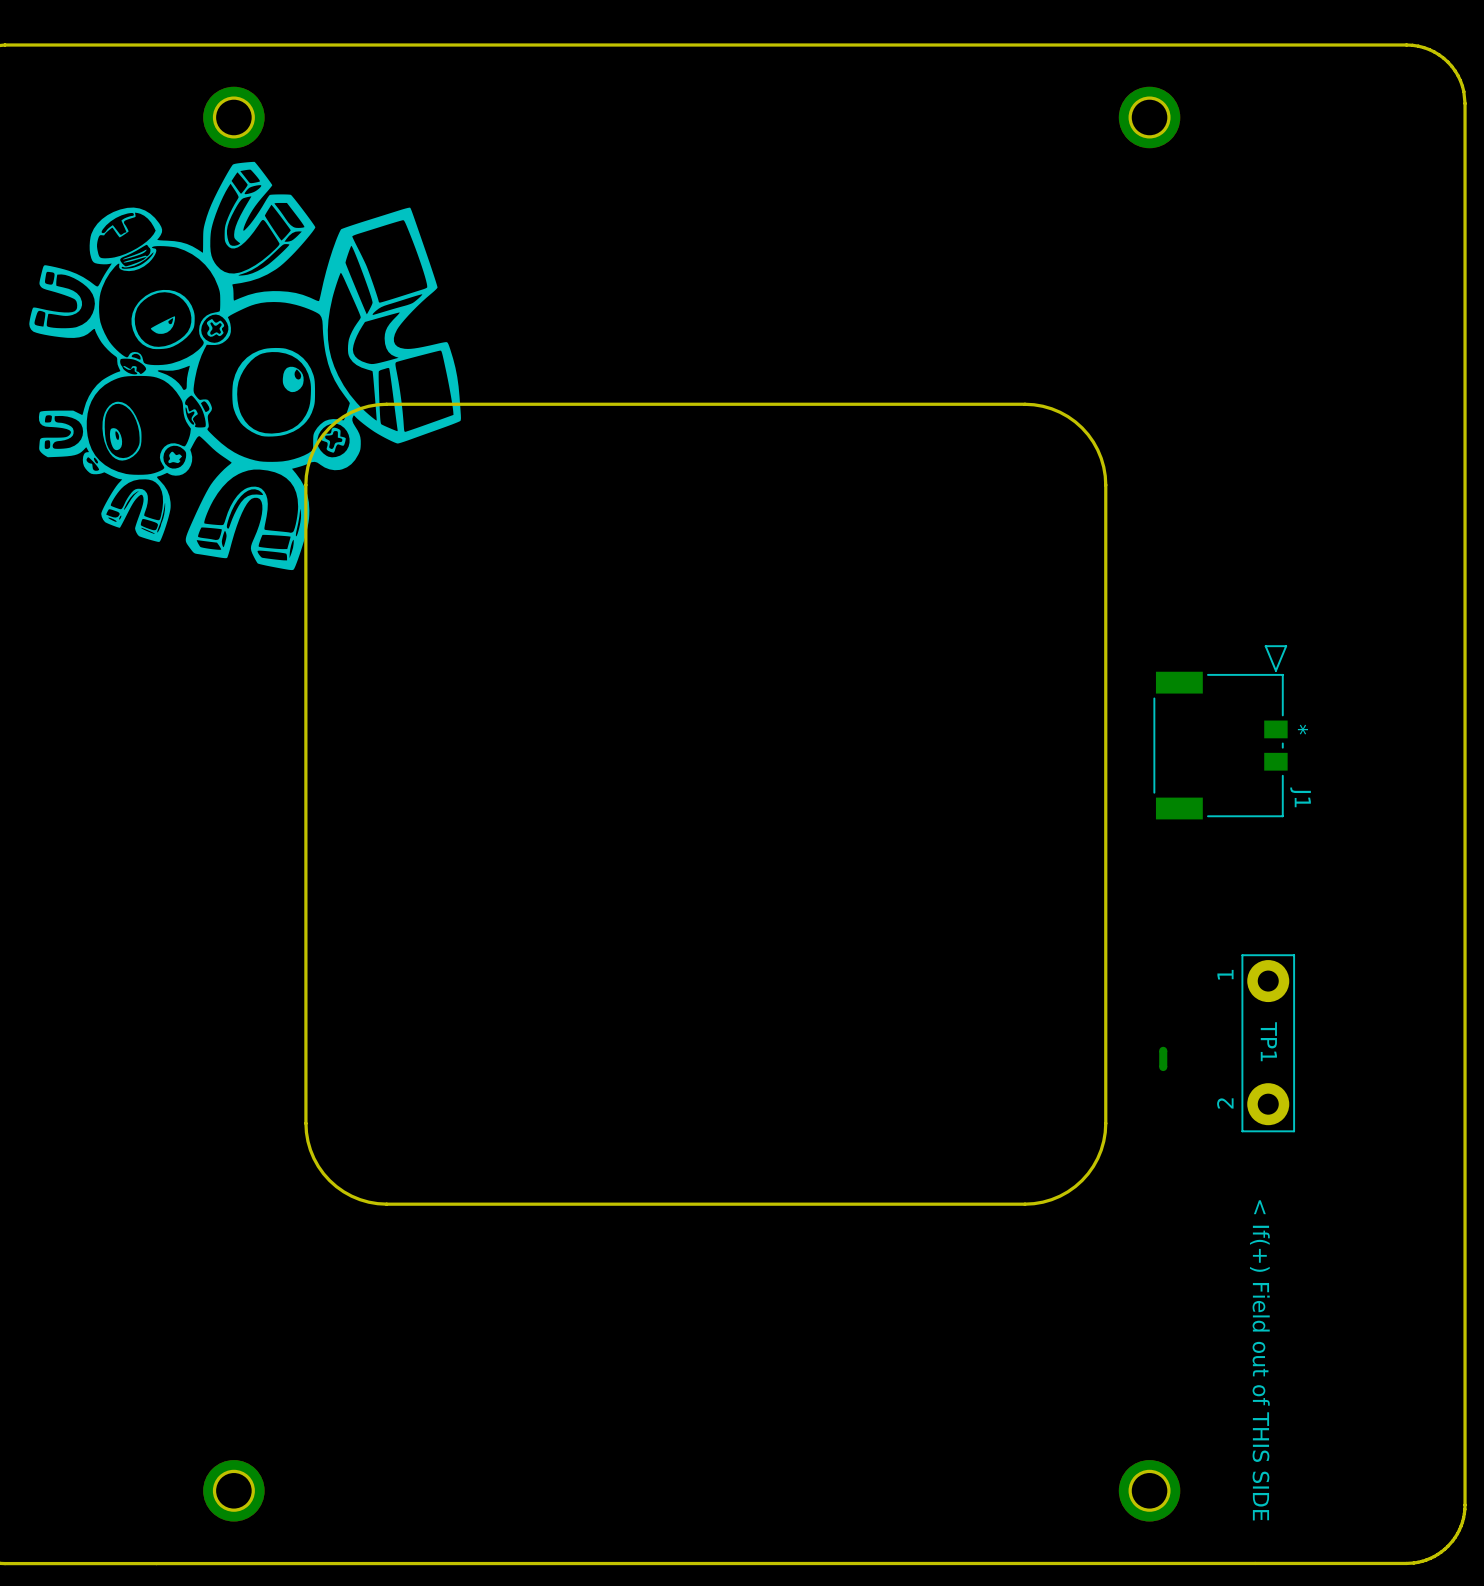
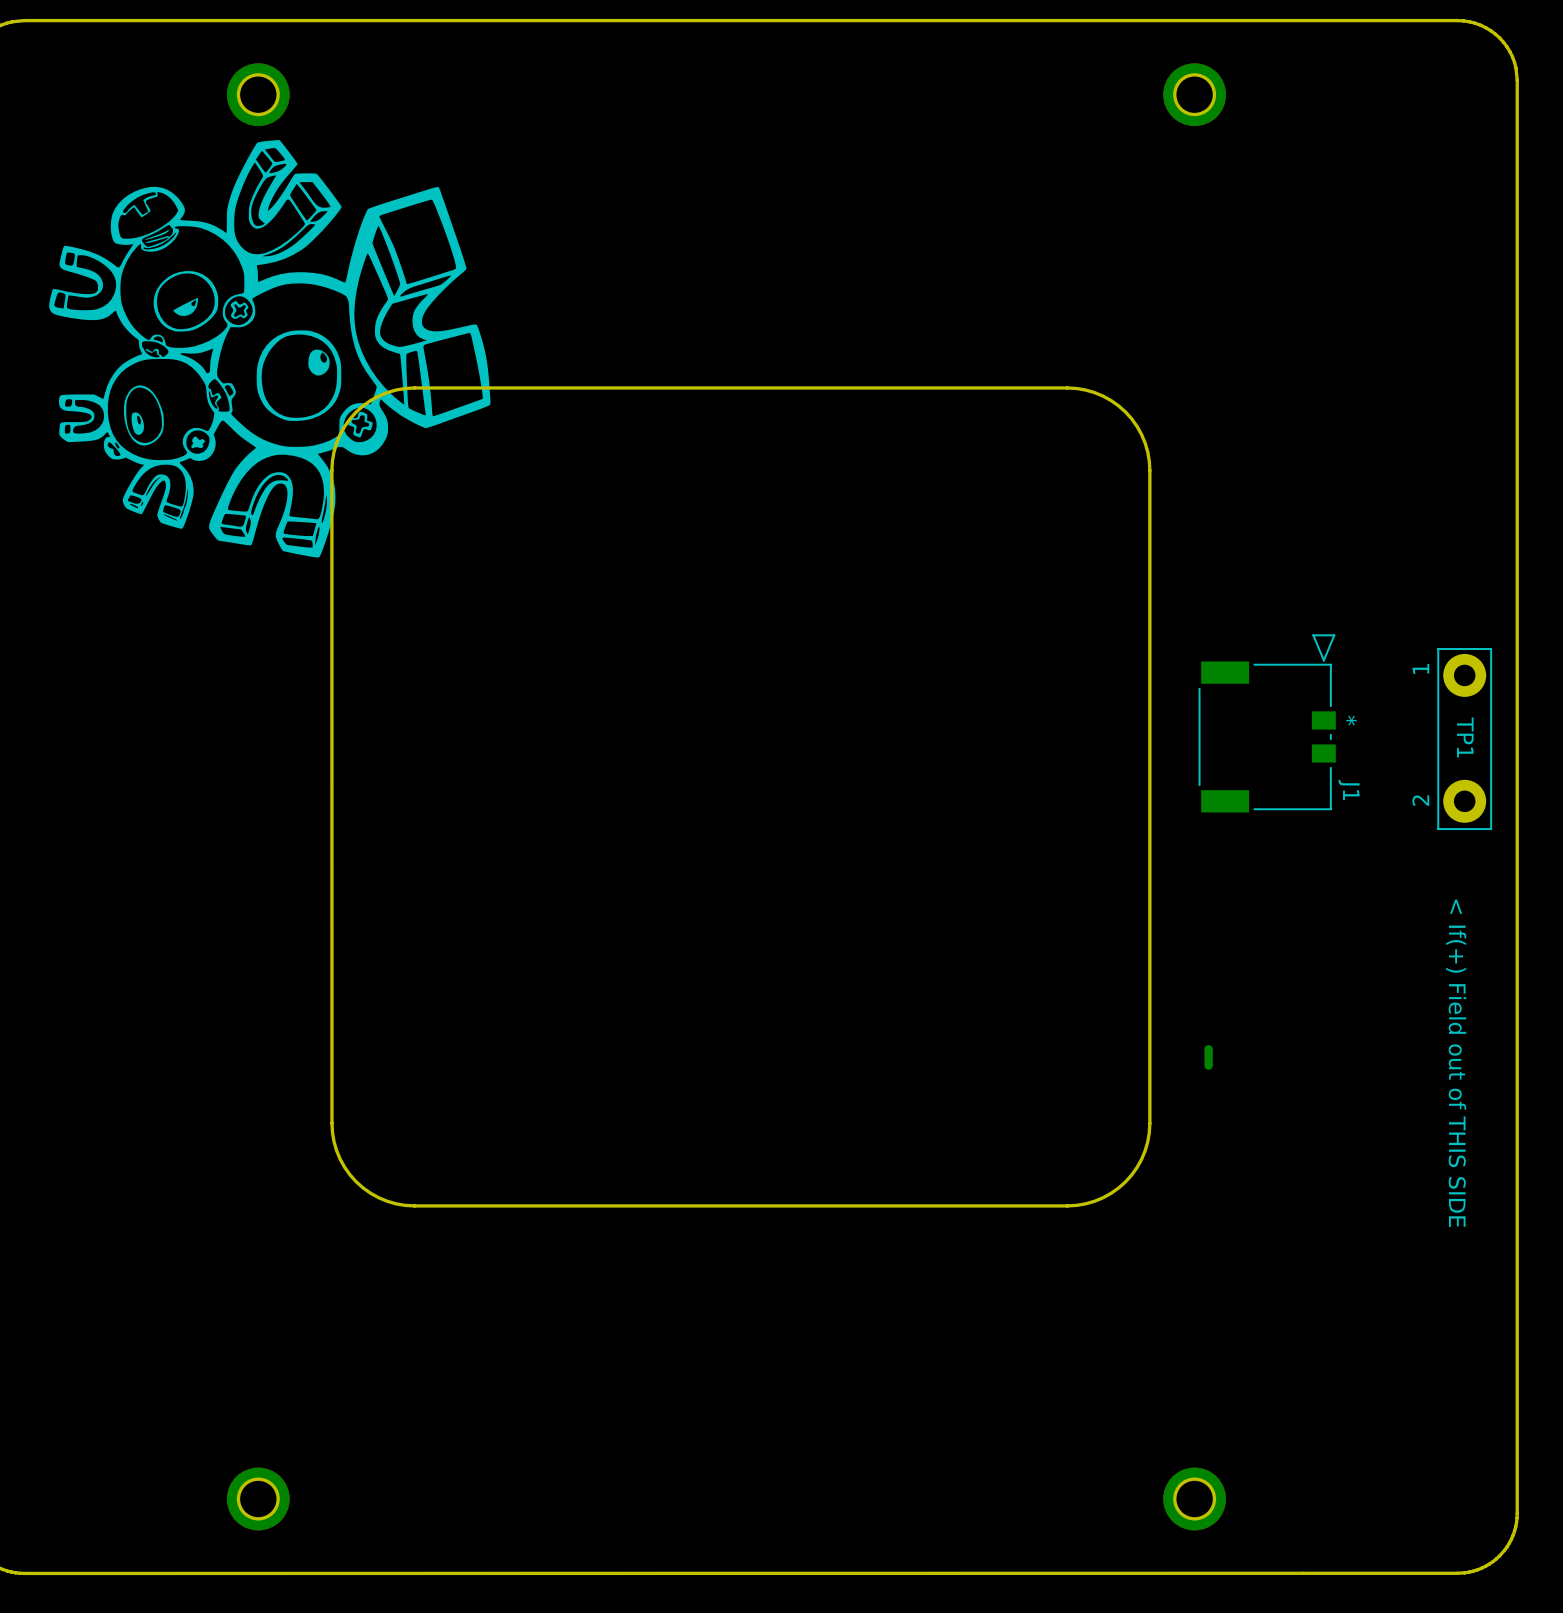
text position: 1 (1225, 974) -> 1 (1420, 668)
TP1 position: (1268, 1043) -> (1464, 739)
text position: 2 (1225, 1103) -> 2 (1420, 800)
text position: < If(+) Field out of THIS SIDE (1259, 1360) -> < If(+) Field out of THIS SIDE (1456, 1063)

